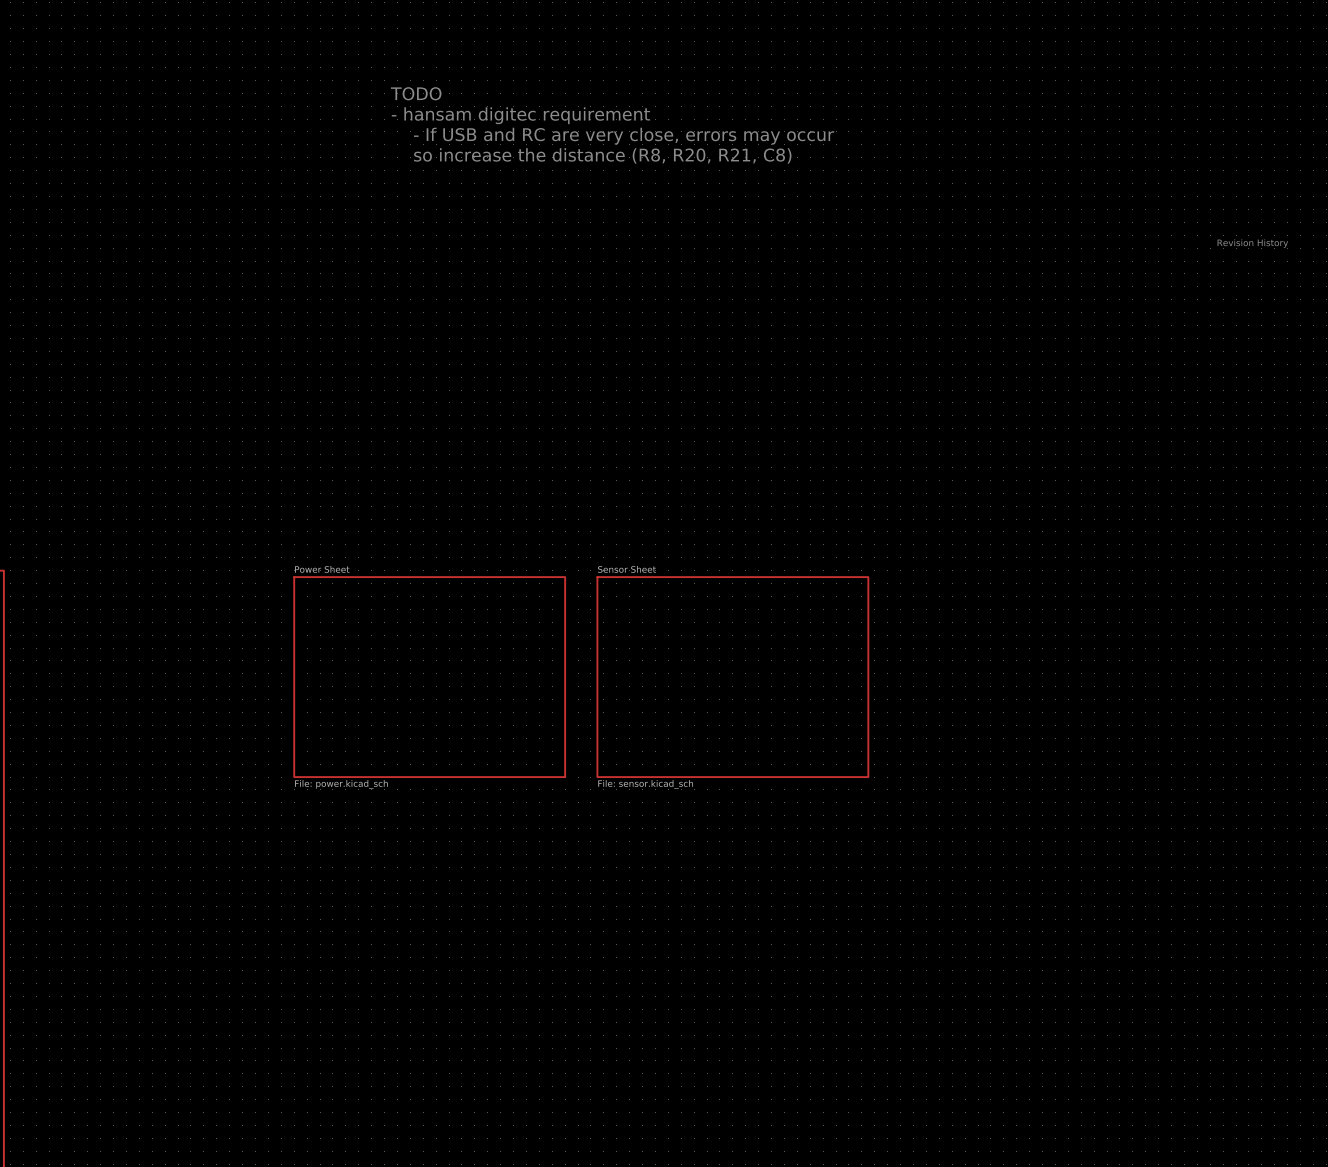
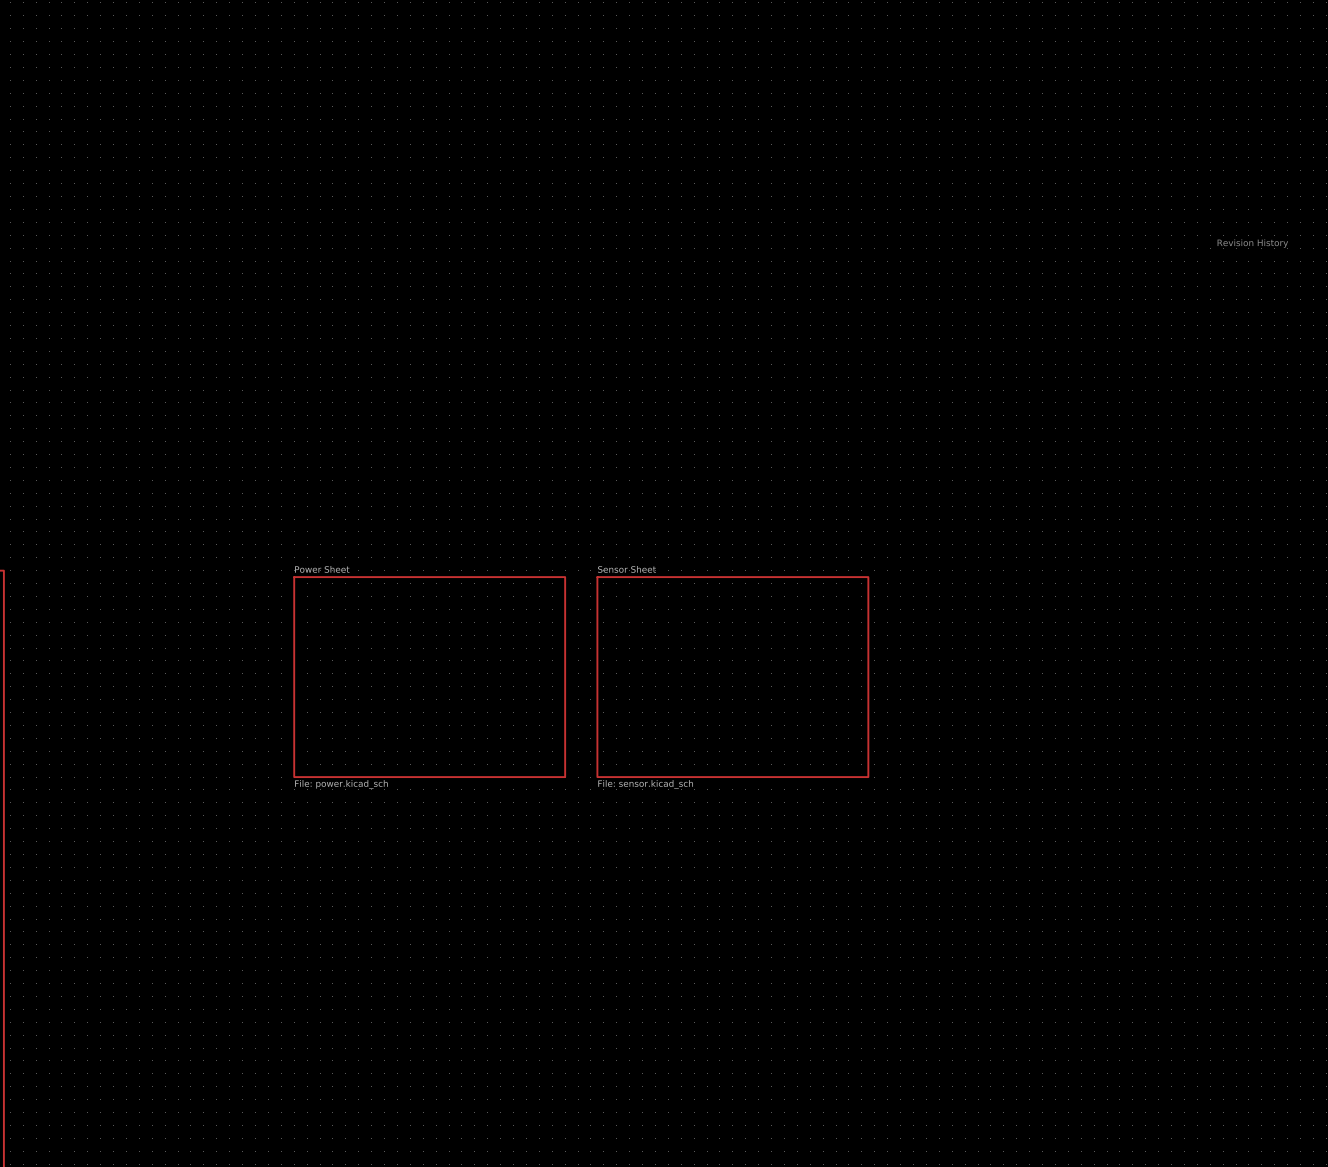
text: TODO (416, 93) -> none
text: - hansam digitec requirement (520, 115) -> none
text: - If USB and RC are very close, errors may occur (624, 136) -> none
text: so increase the distance (R8, R20, R21, C8) (602, 155) -> none

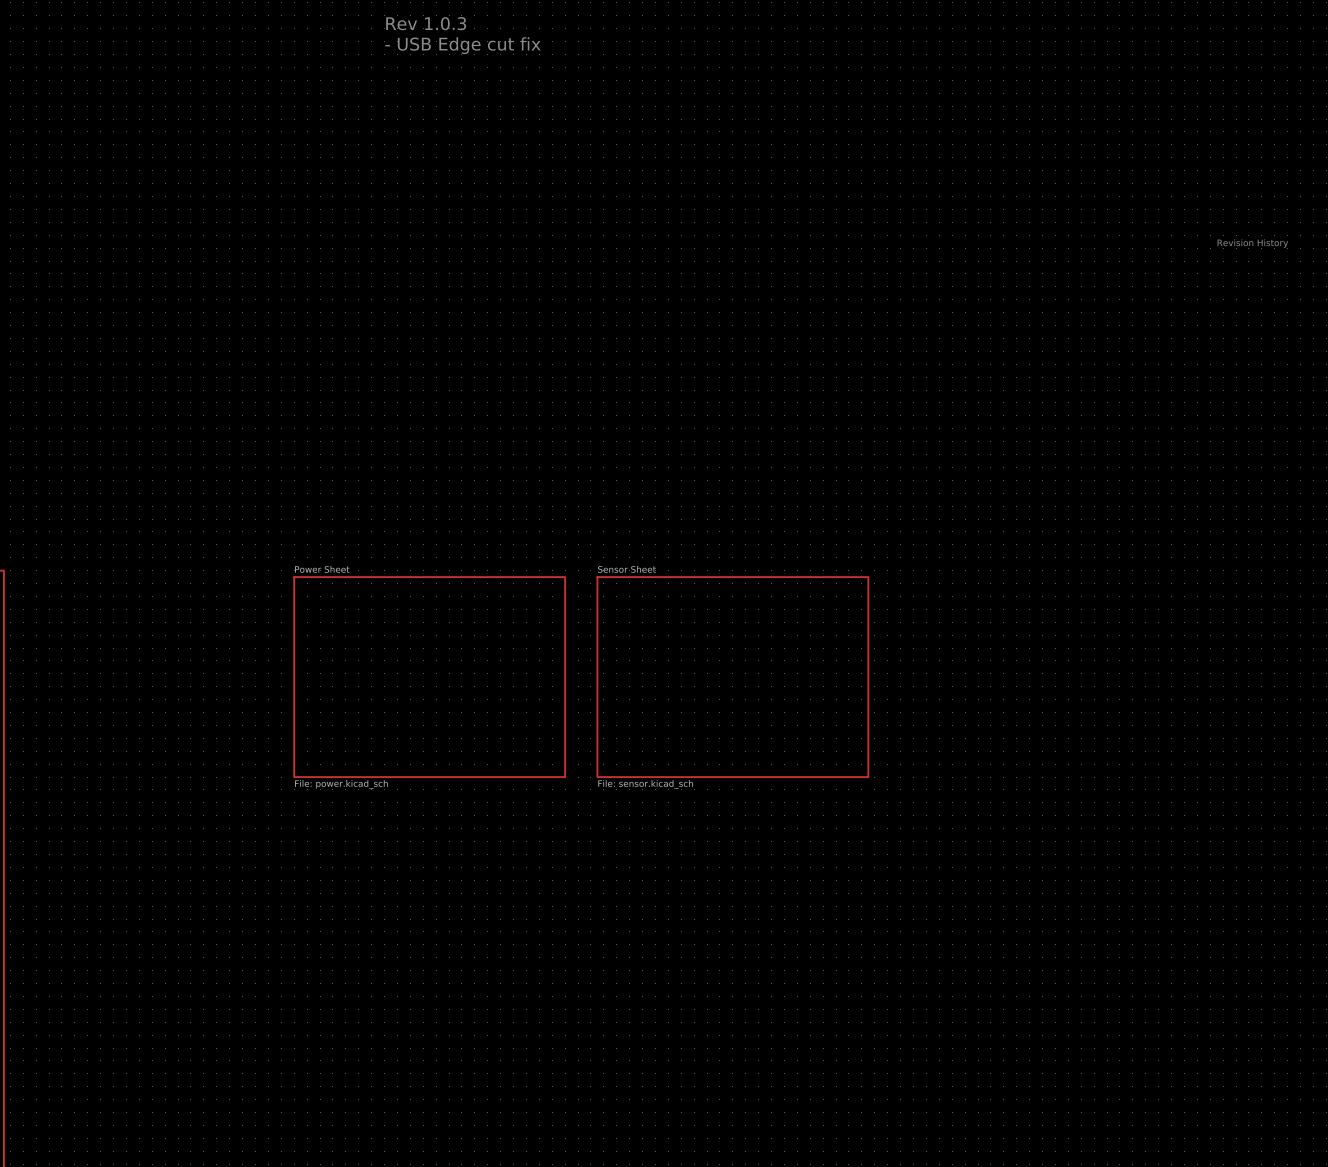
text: none -> Rev 1.0.3 (426, 23)
text: none -> - USB Edge cut fix (463, 45)

